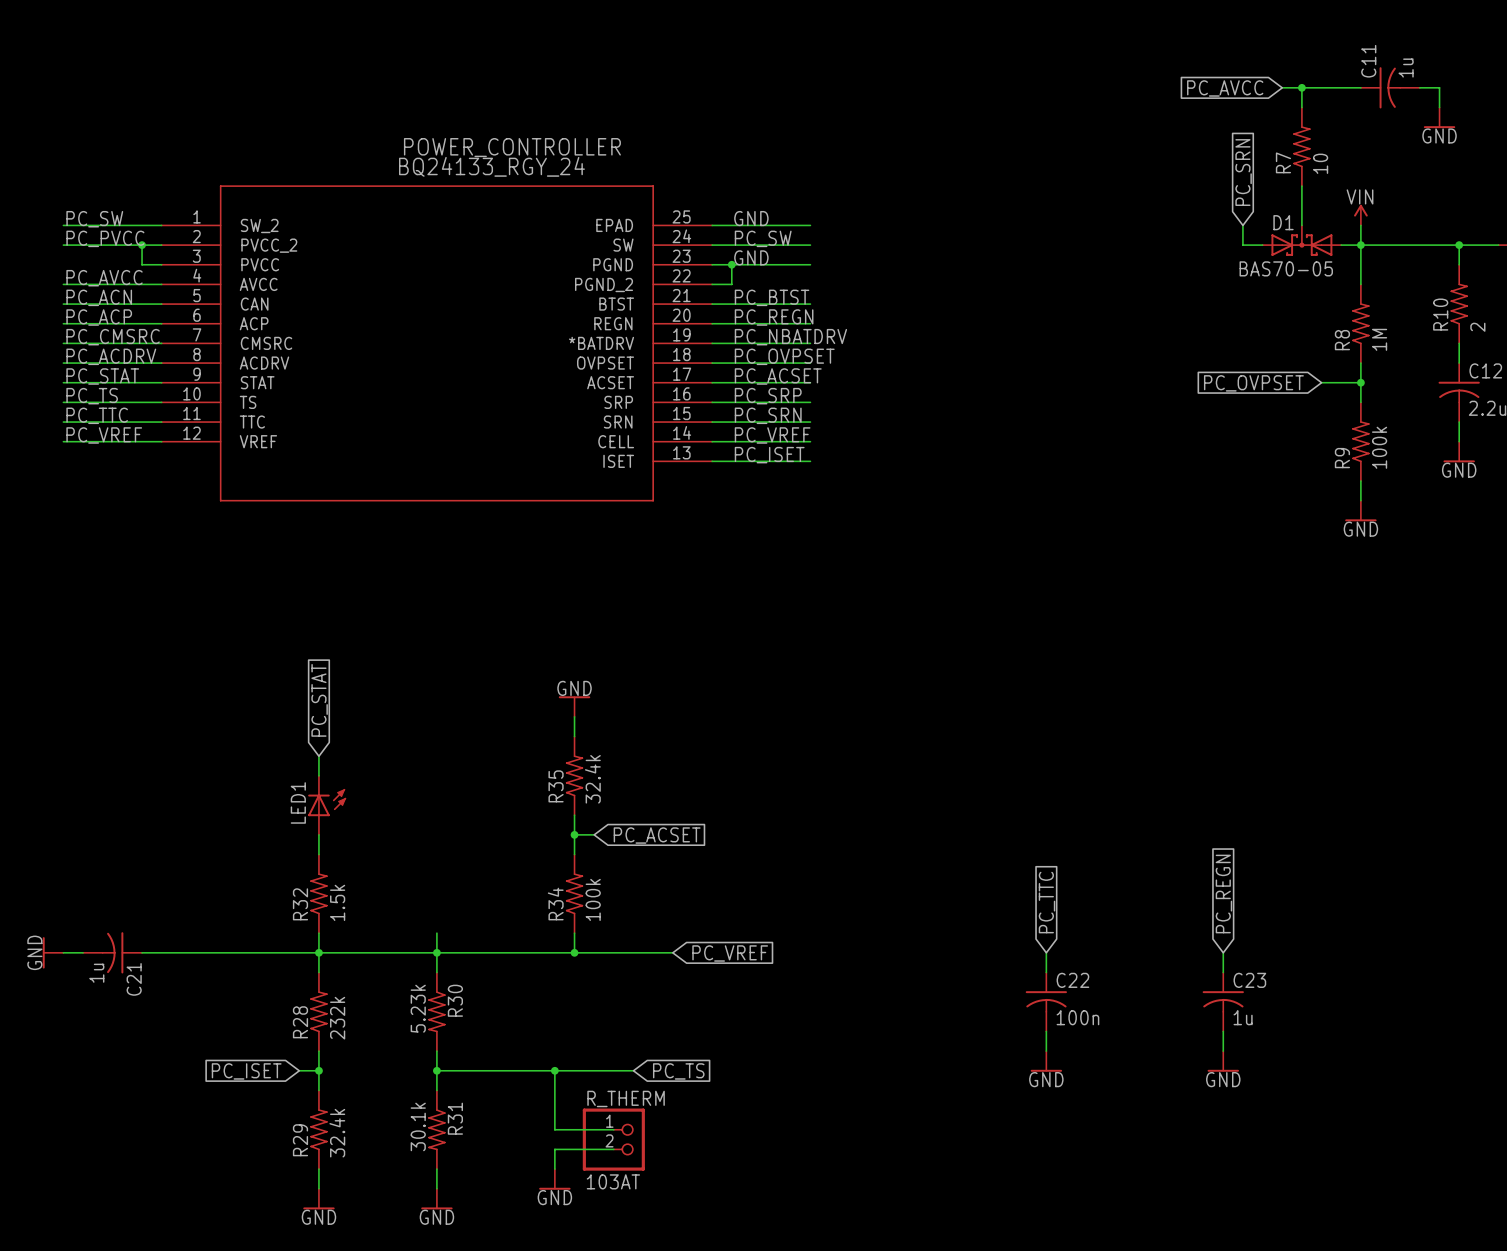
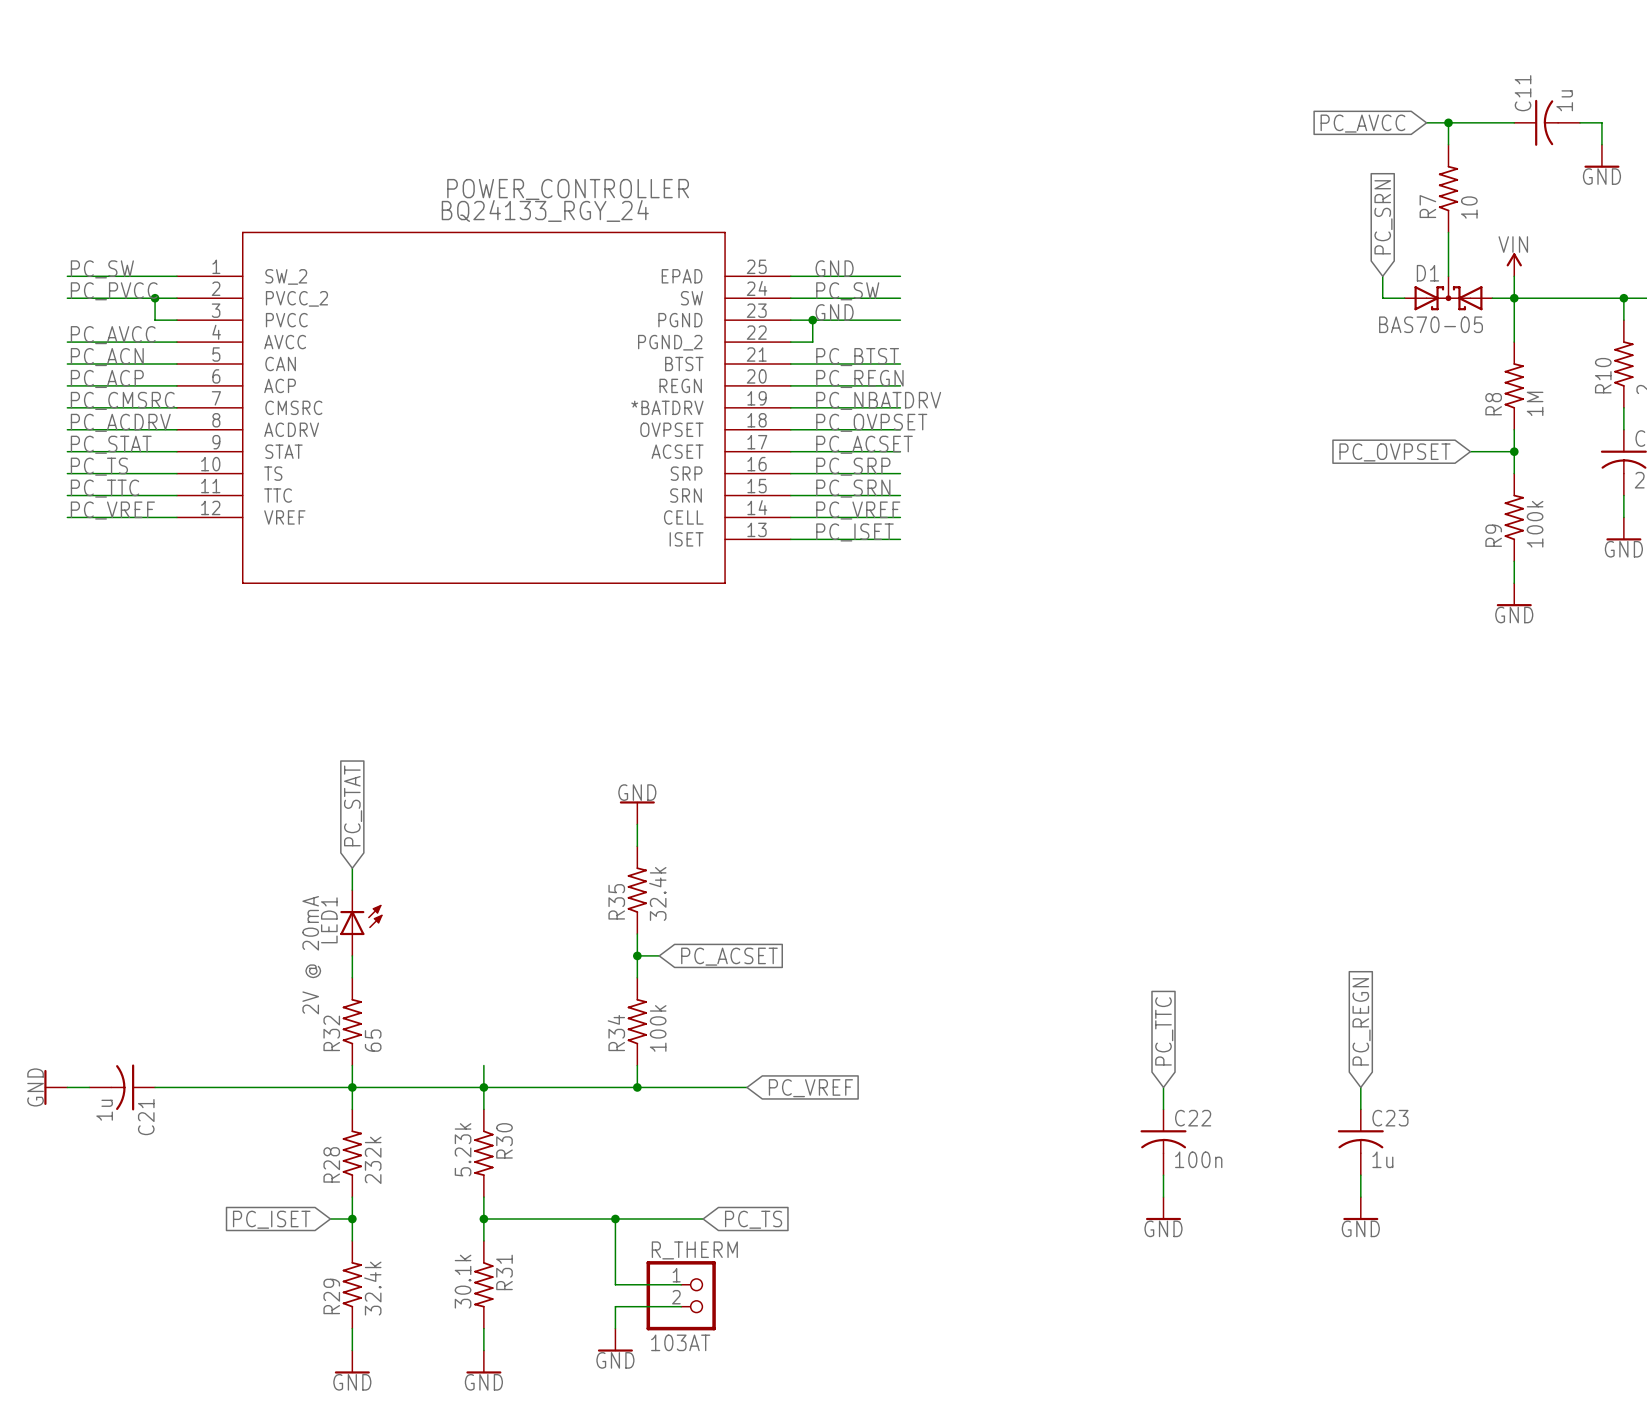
LED1 value: none -> 2V @ 20mA (311, 955)
R32 value: 1.5k (337, 902) -> 65 (373, 1040)

